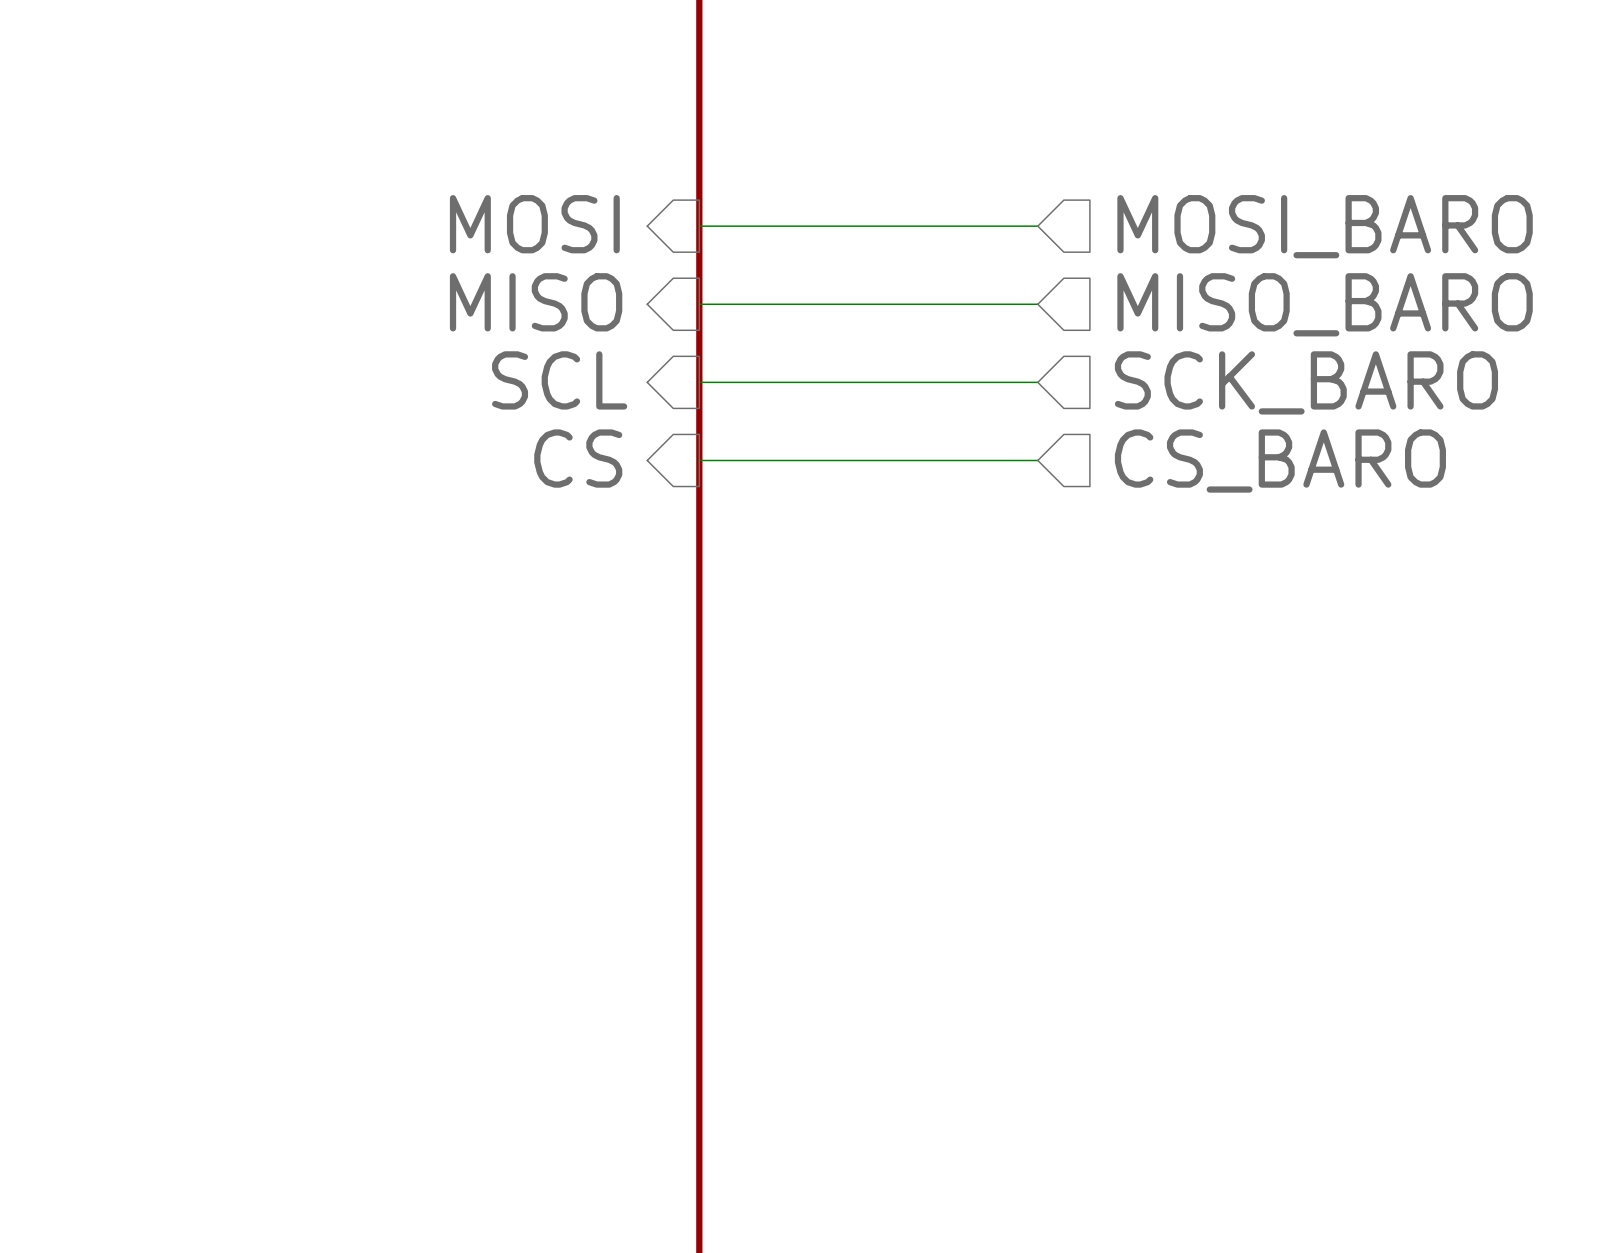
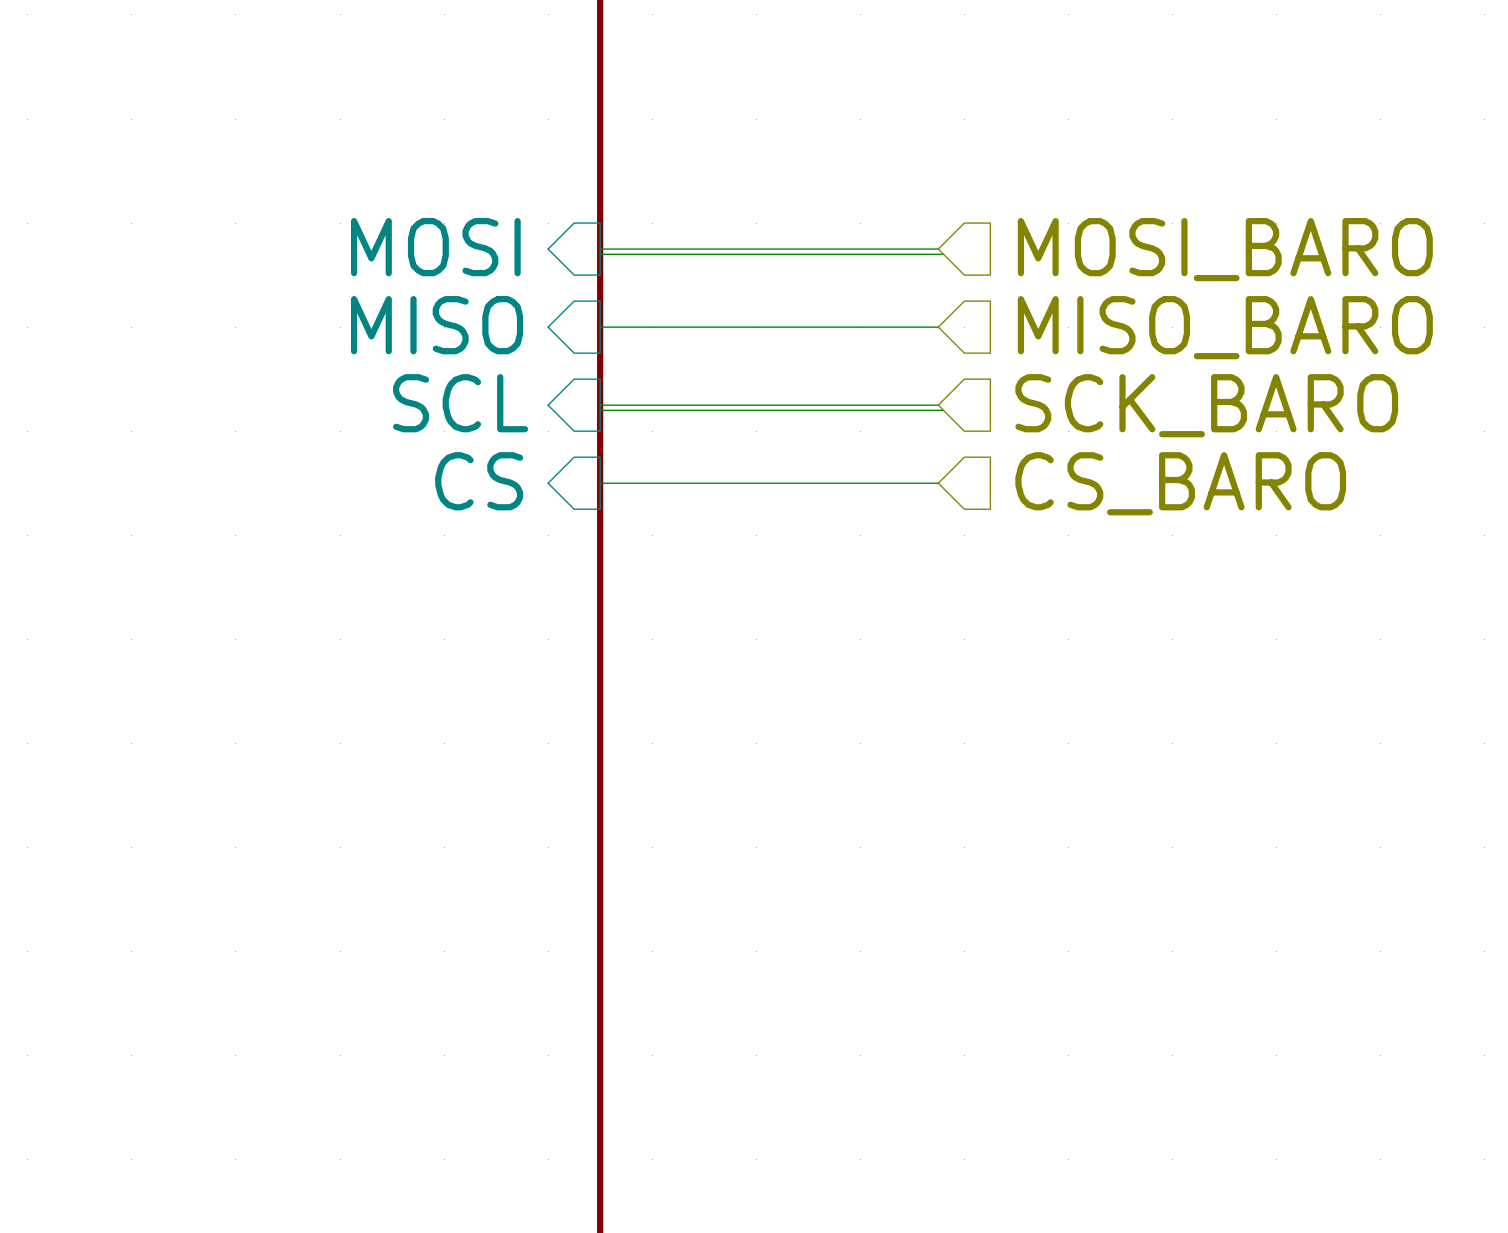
wire: none -> (600, 254) (943, 254)
wire: none -> (600, 410) (943, 410)

